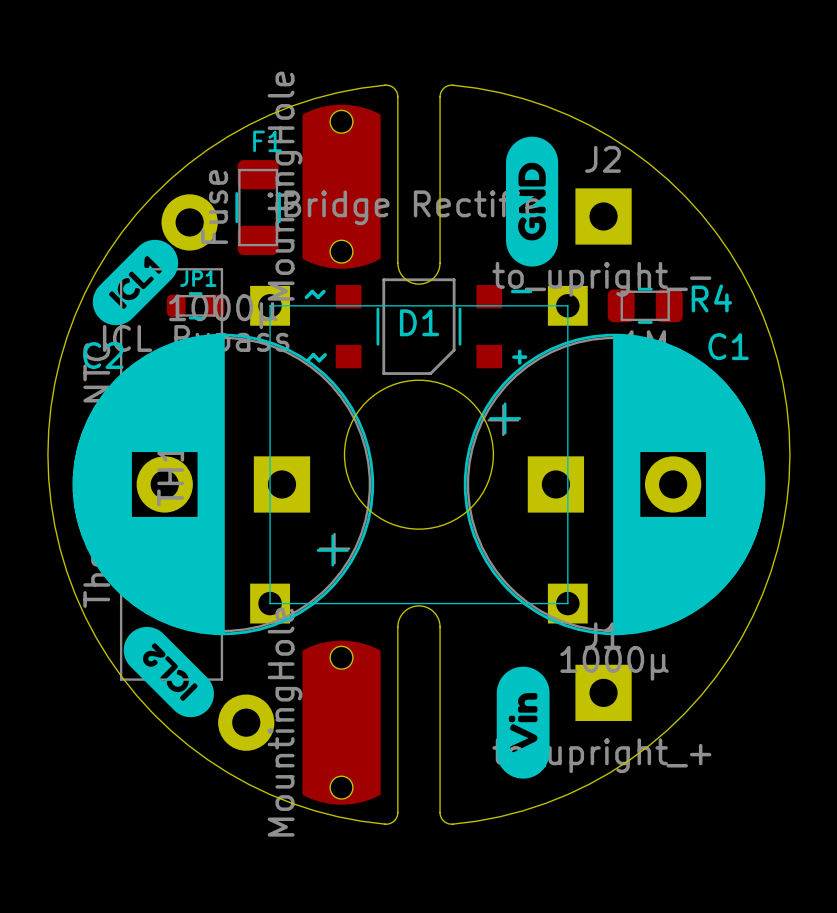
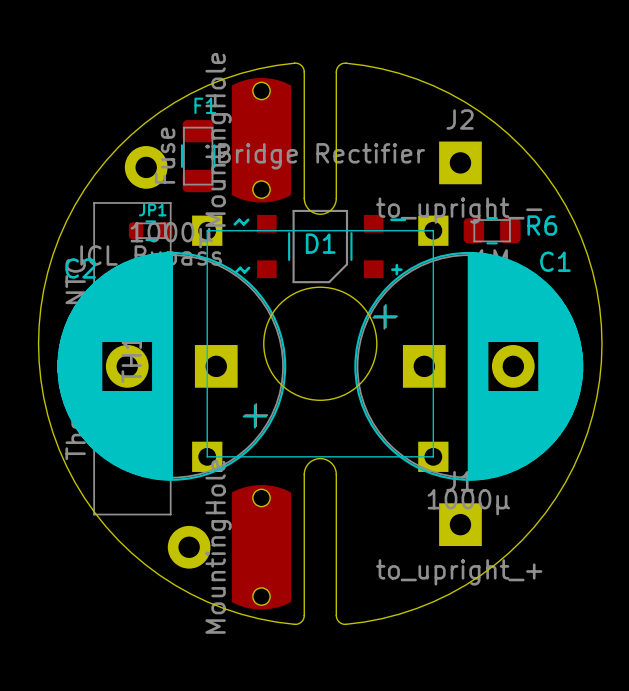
drawing: [506, 136, 559, 267] -> none
drawing: [92, 239, 179, 326] -> none
R4 name: R4 (711, 298) -> R6 (542, 225)
drawing: [123, 626, 214, 718] -> none
drawing: [496, 666, 550, 779] -> none

